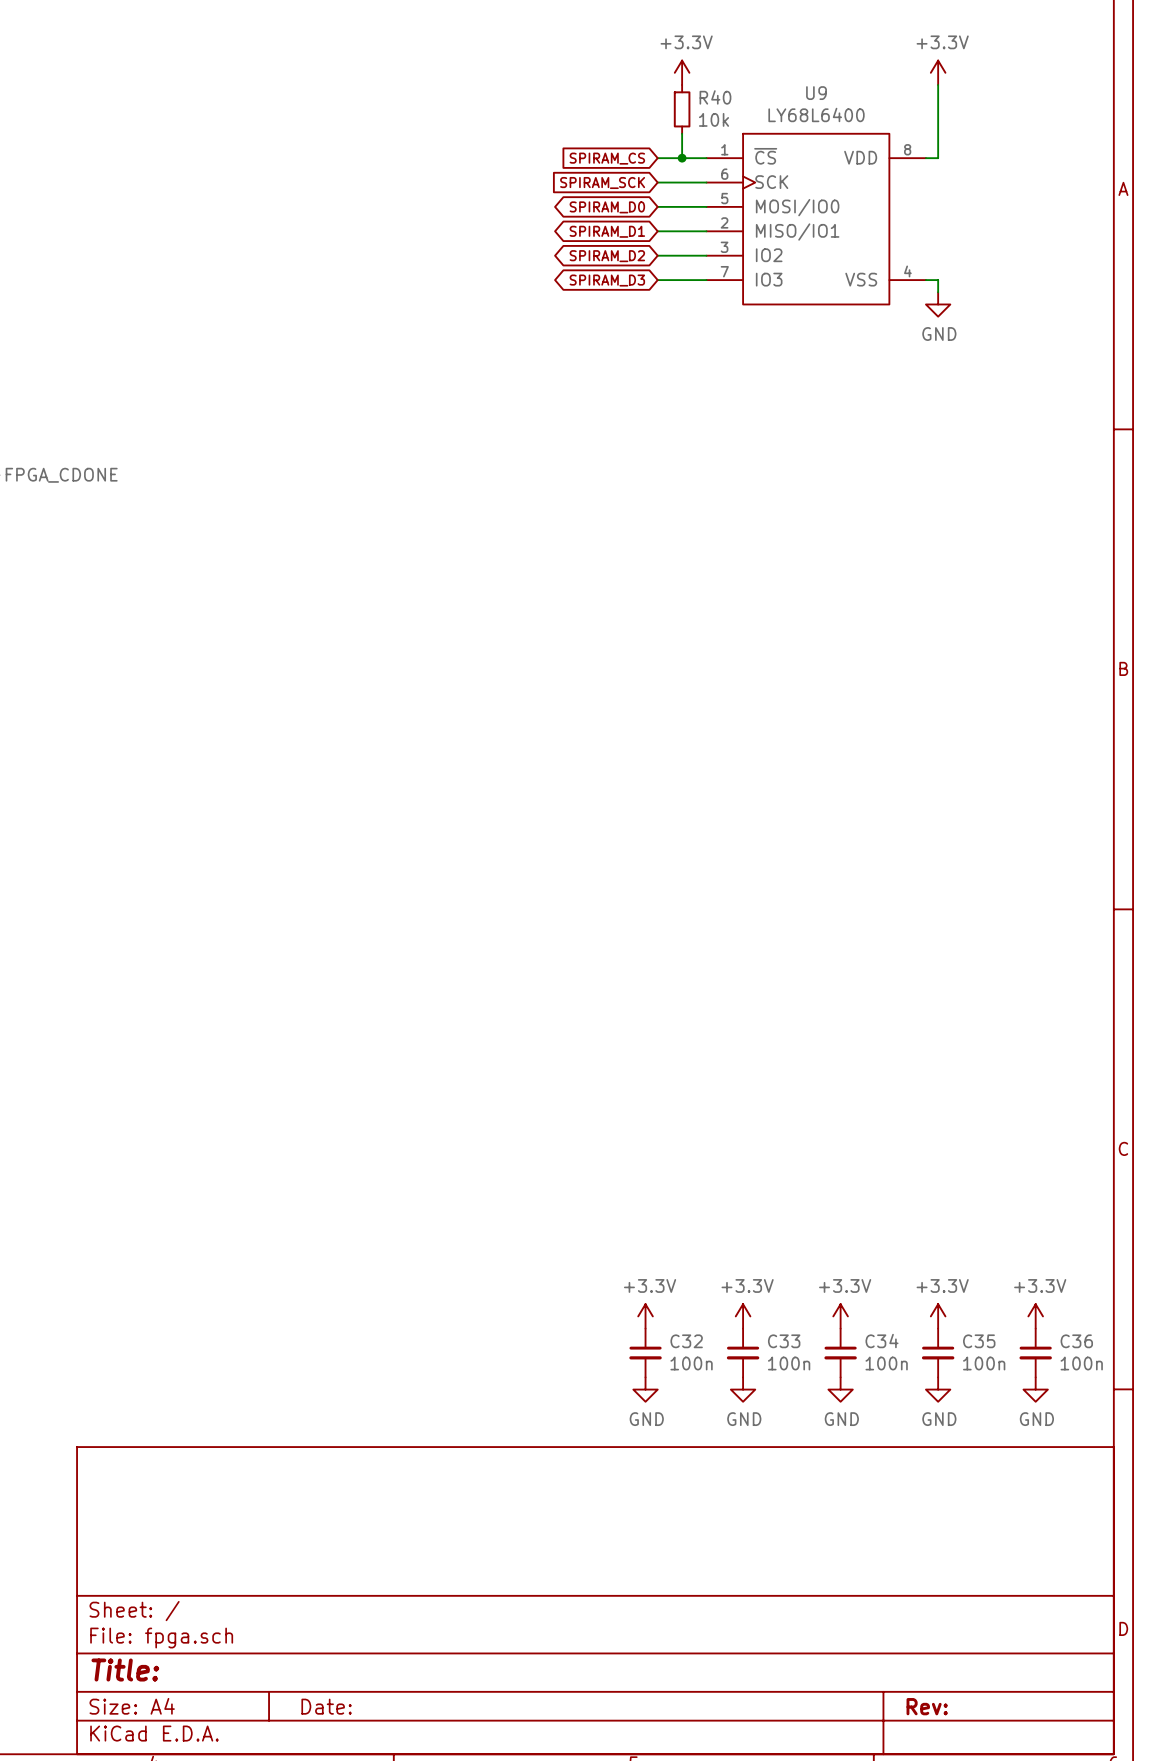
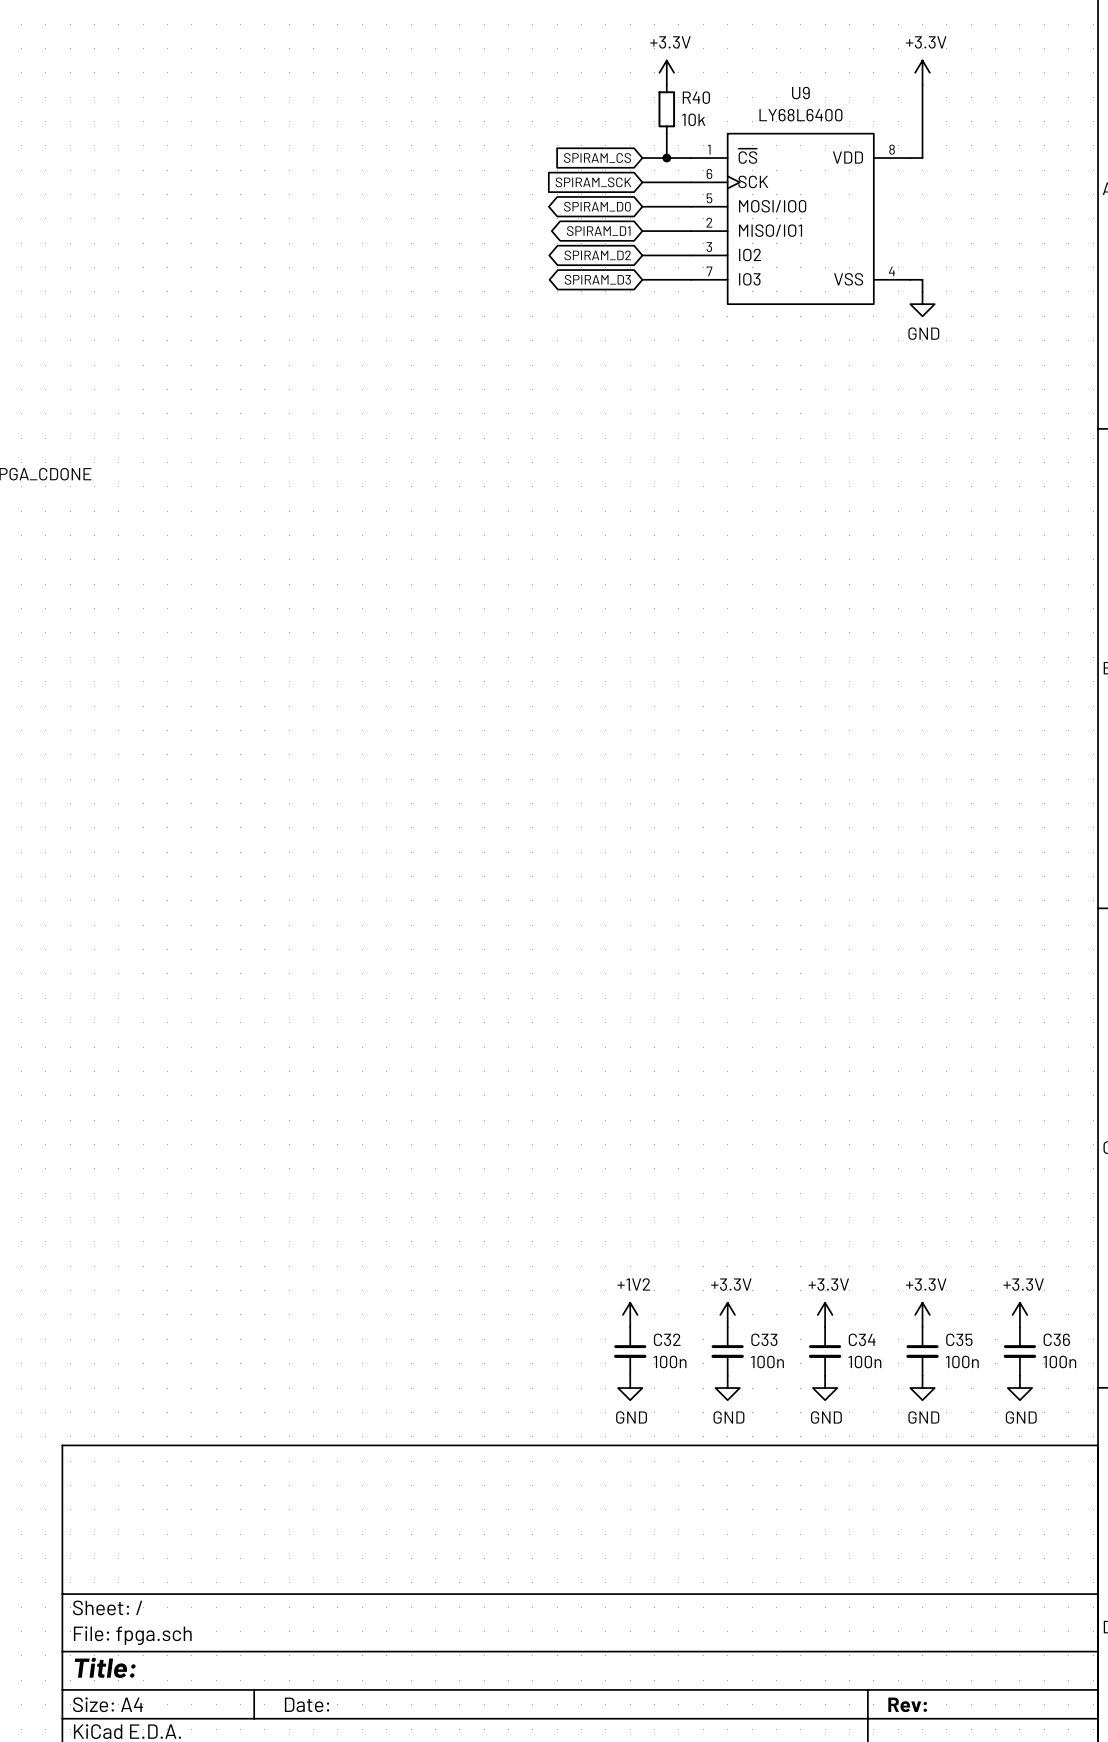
power symbol: +3.3V (645, 1316) -> +1V2 (630, 1314)

